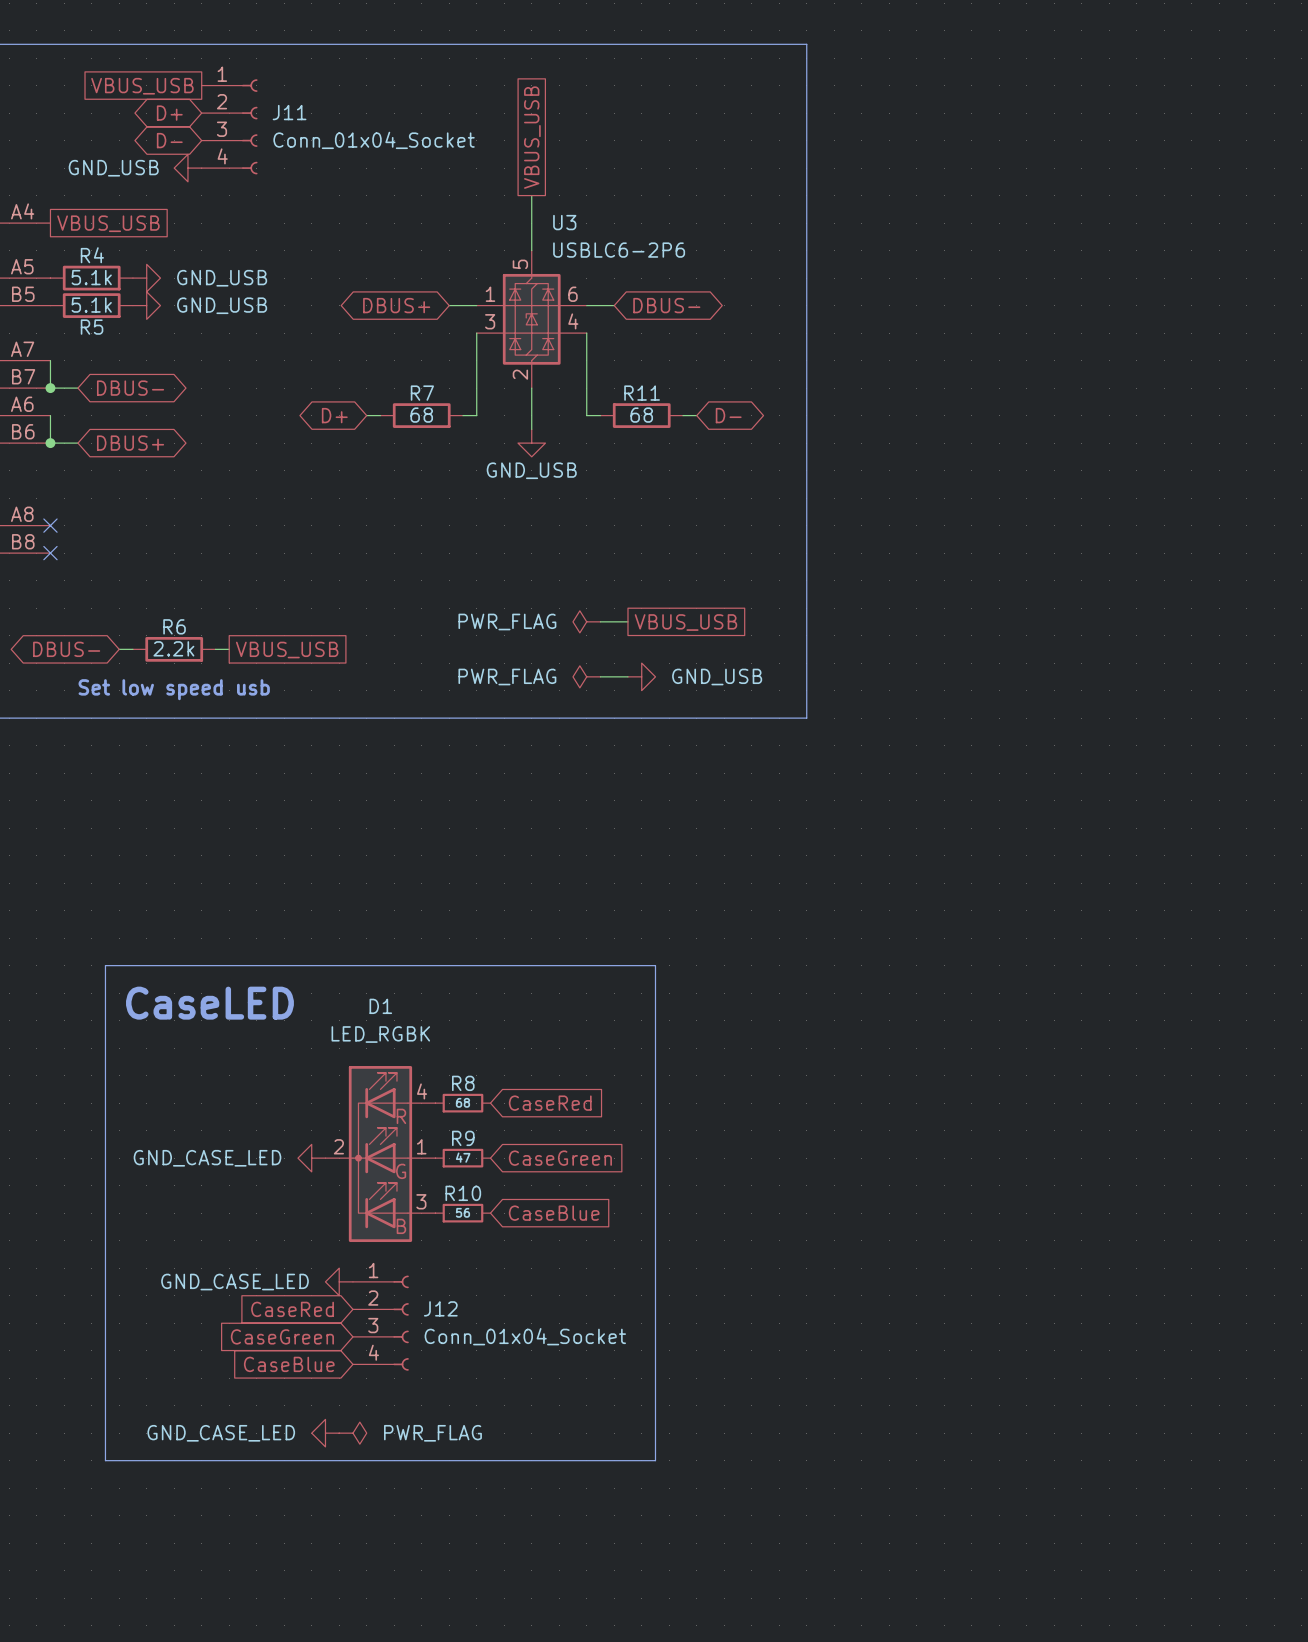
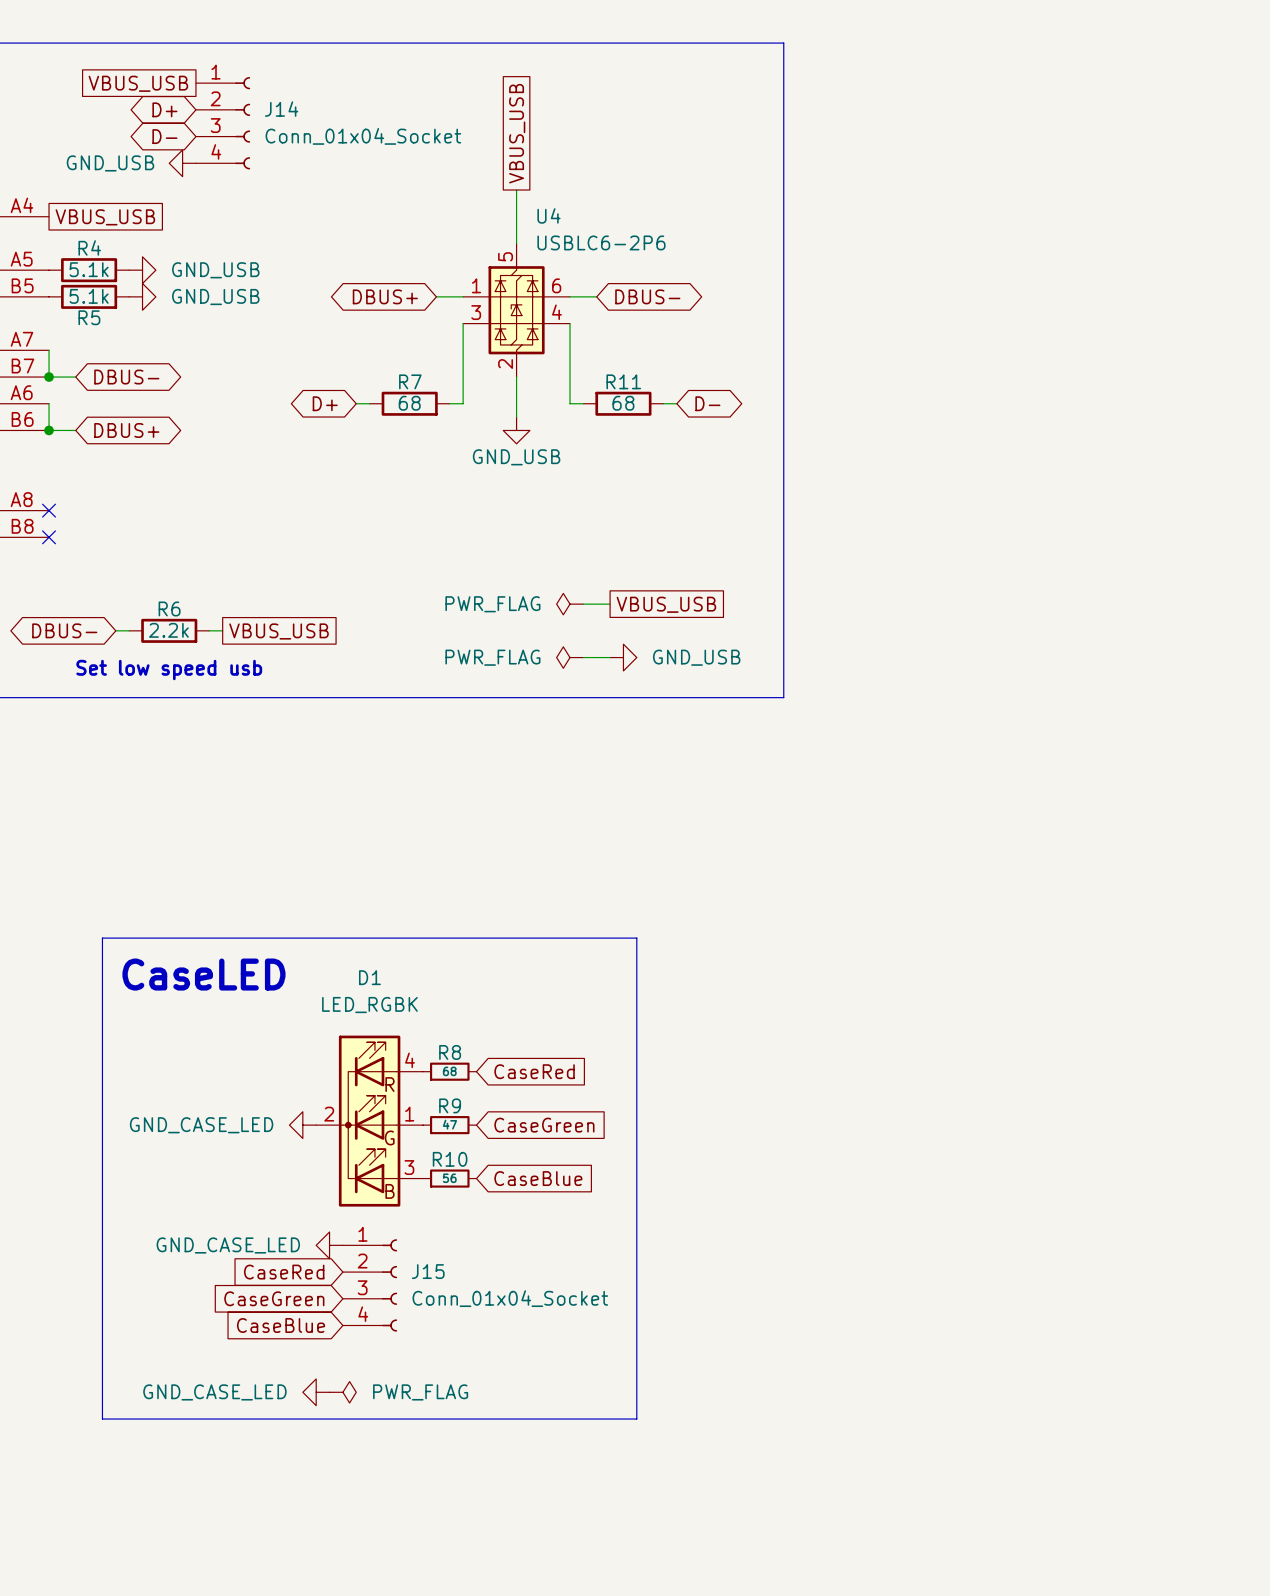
J11 name: J11 (289, 112) -> J14 (281, 109)
U3 name: U3 (564, 222) -> U4 (548, 215)
J12 name: J12 (440, 1308) -> J15 (428, 1271)

